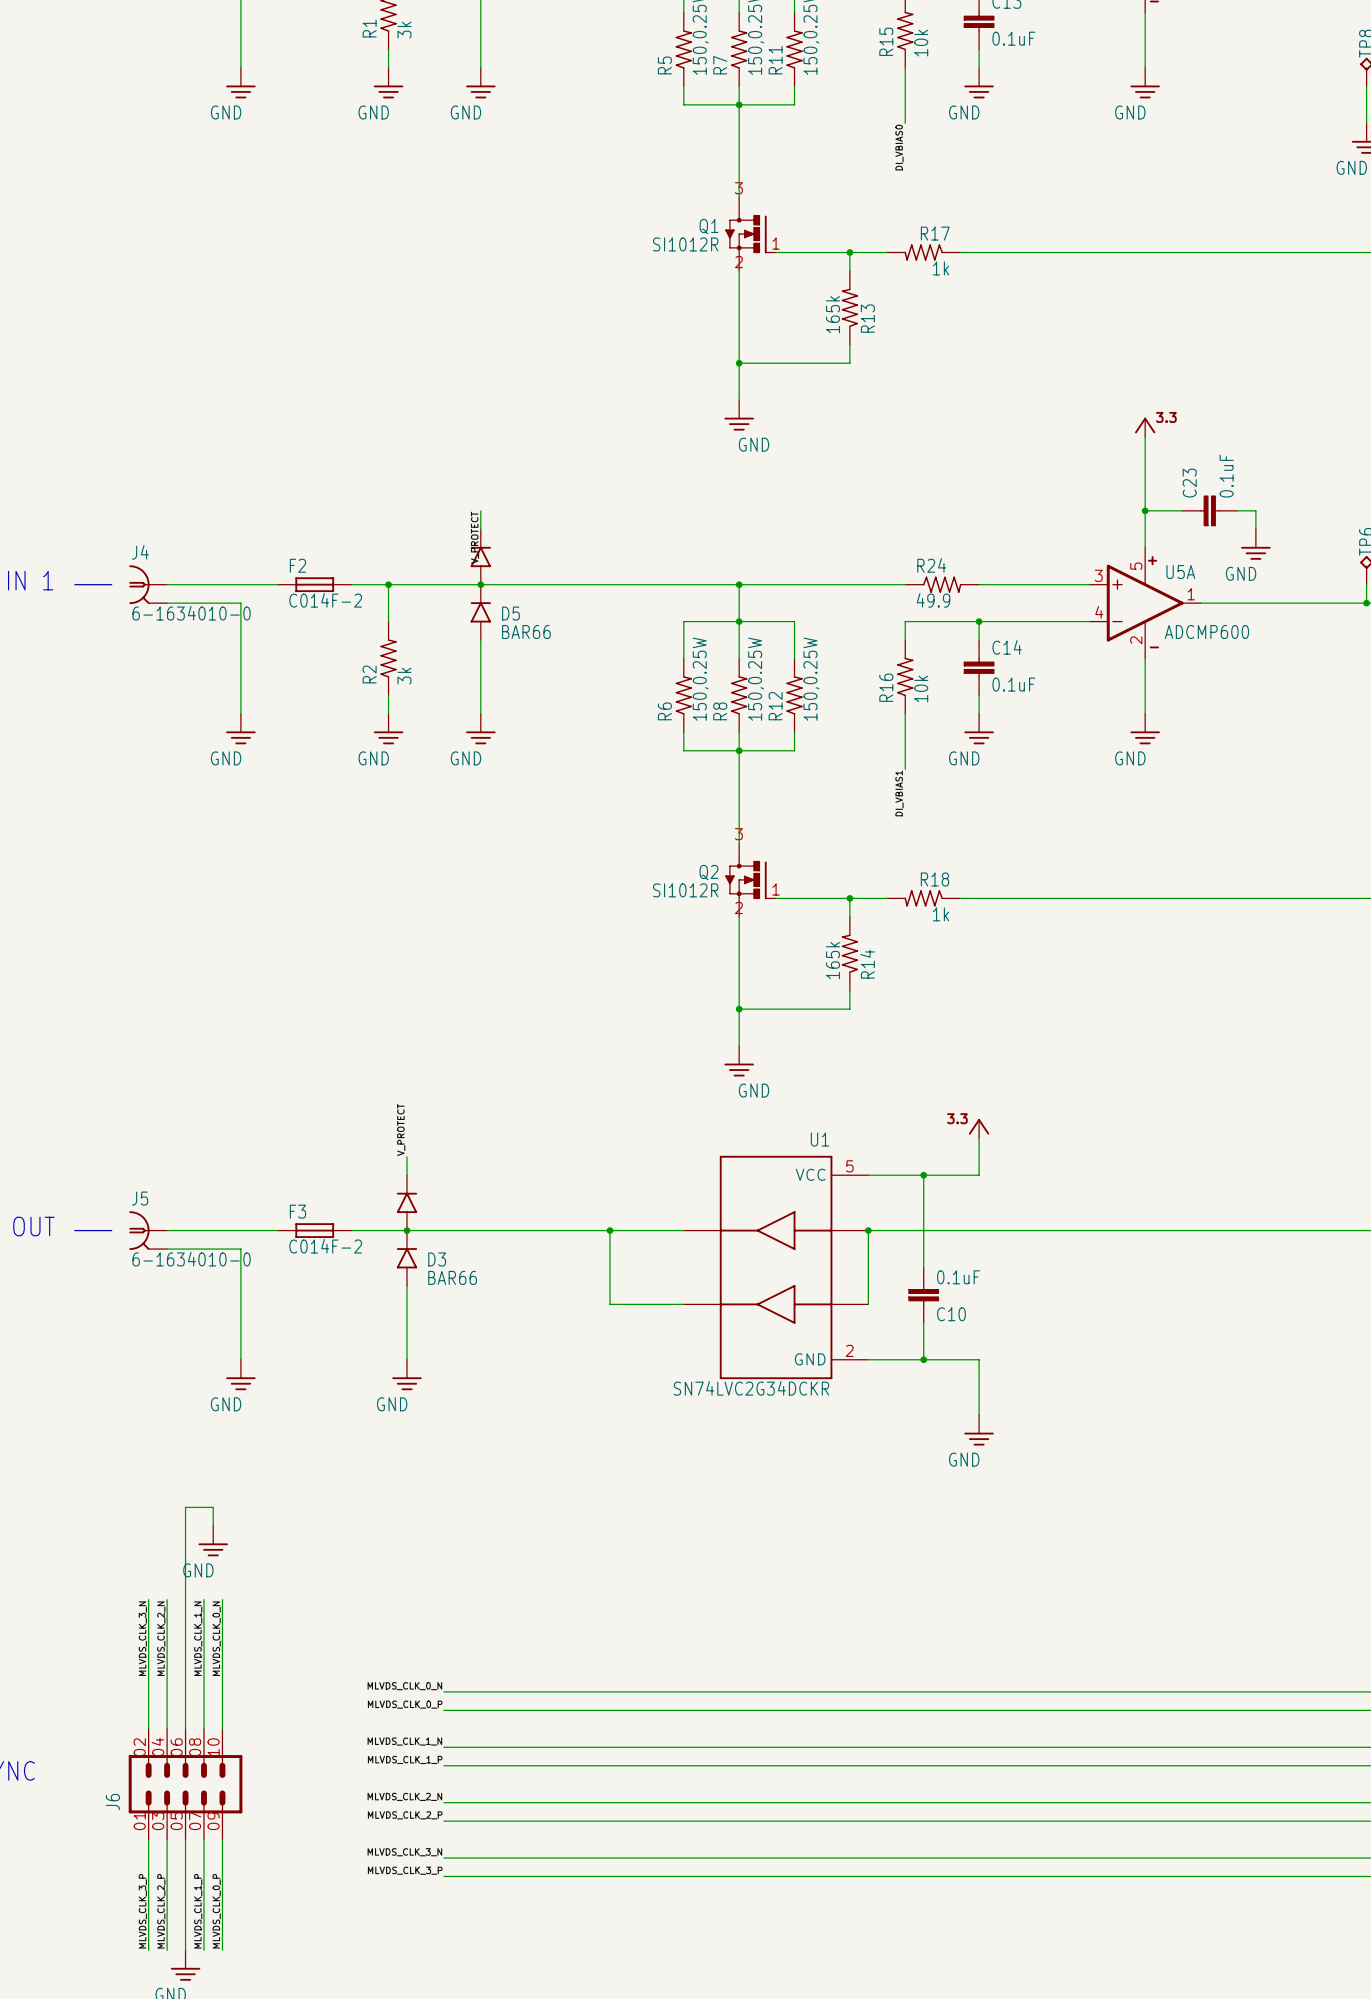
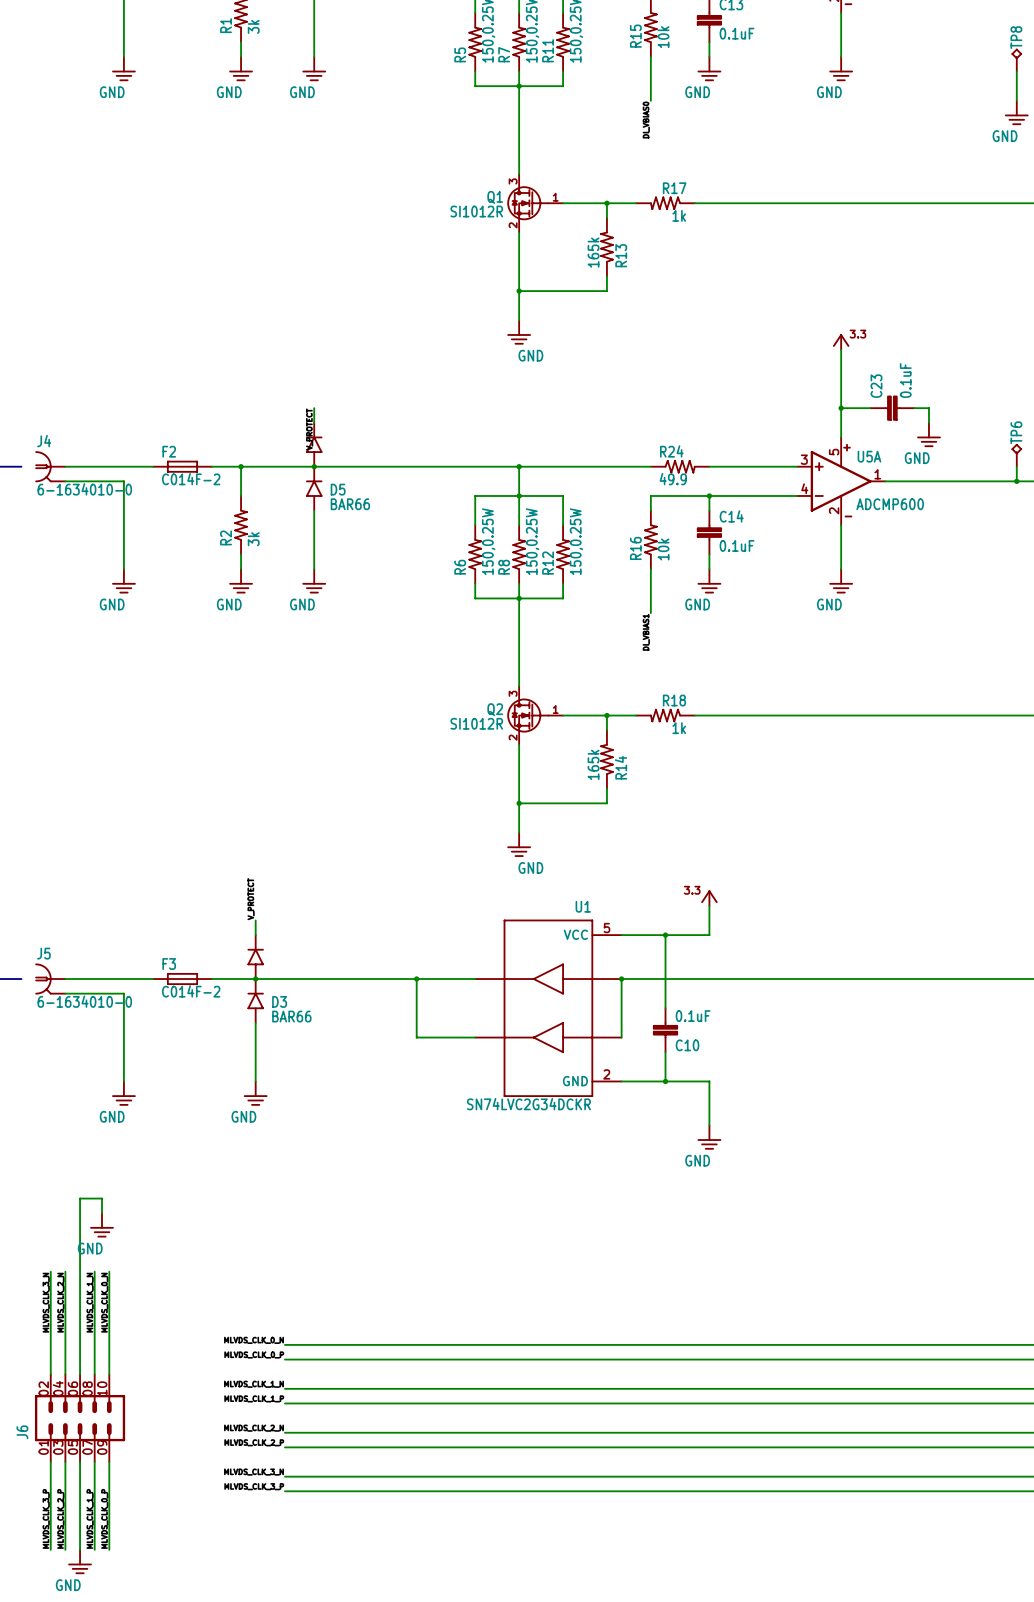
Q1 symbol: [725, 196, 777, 272] -> [507, 173, 564, 233]
Q2 symbol: [725, 842, 777, 918] -> [507, 686, 564, 745]

